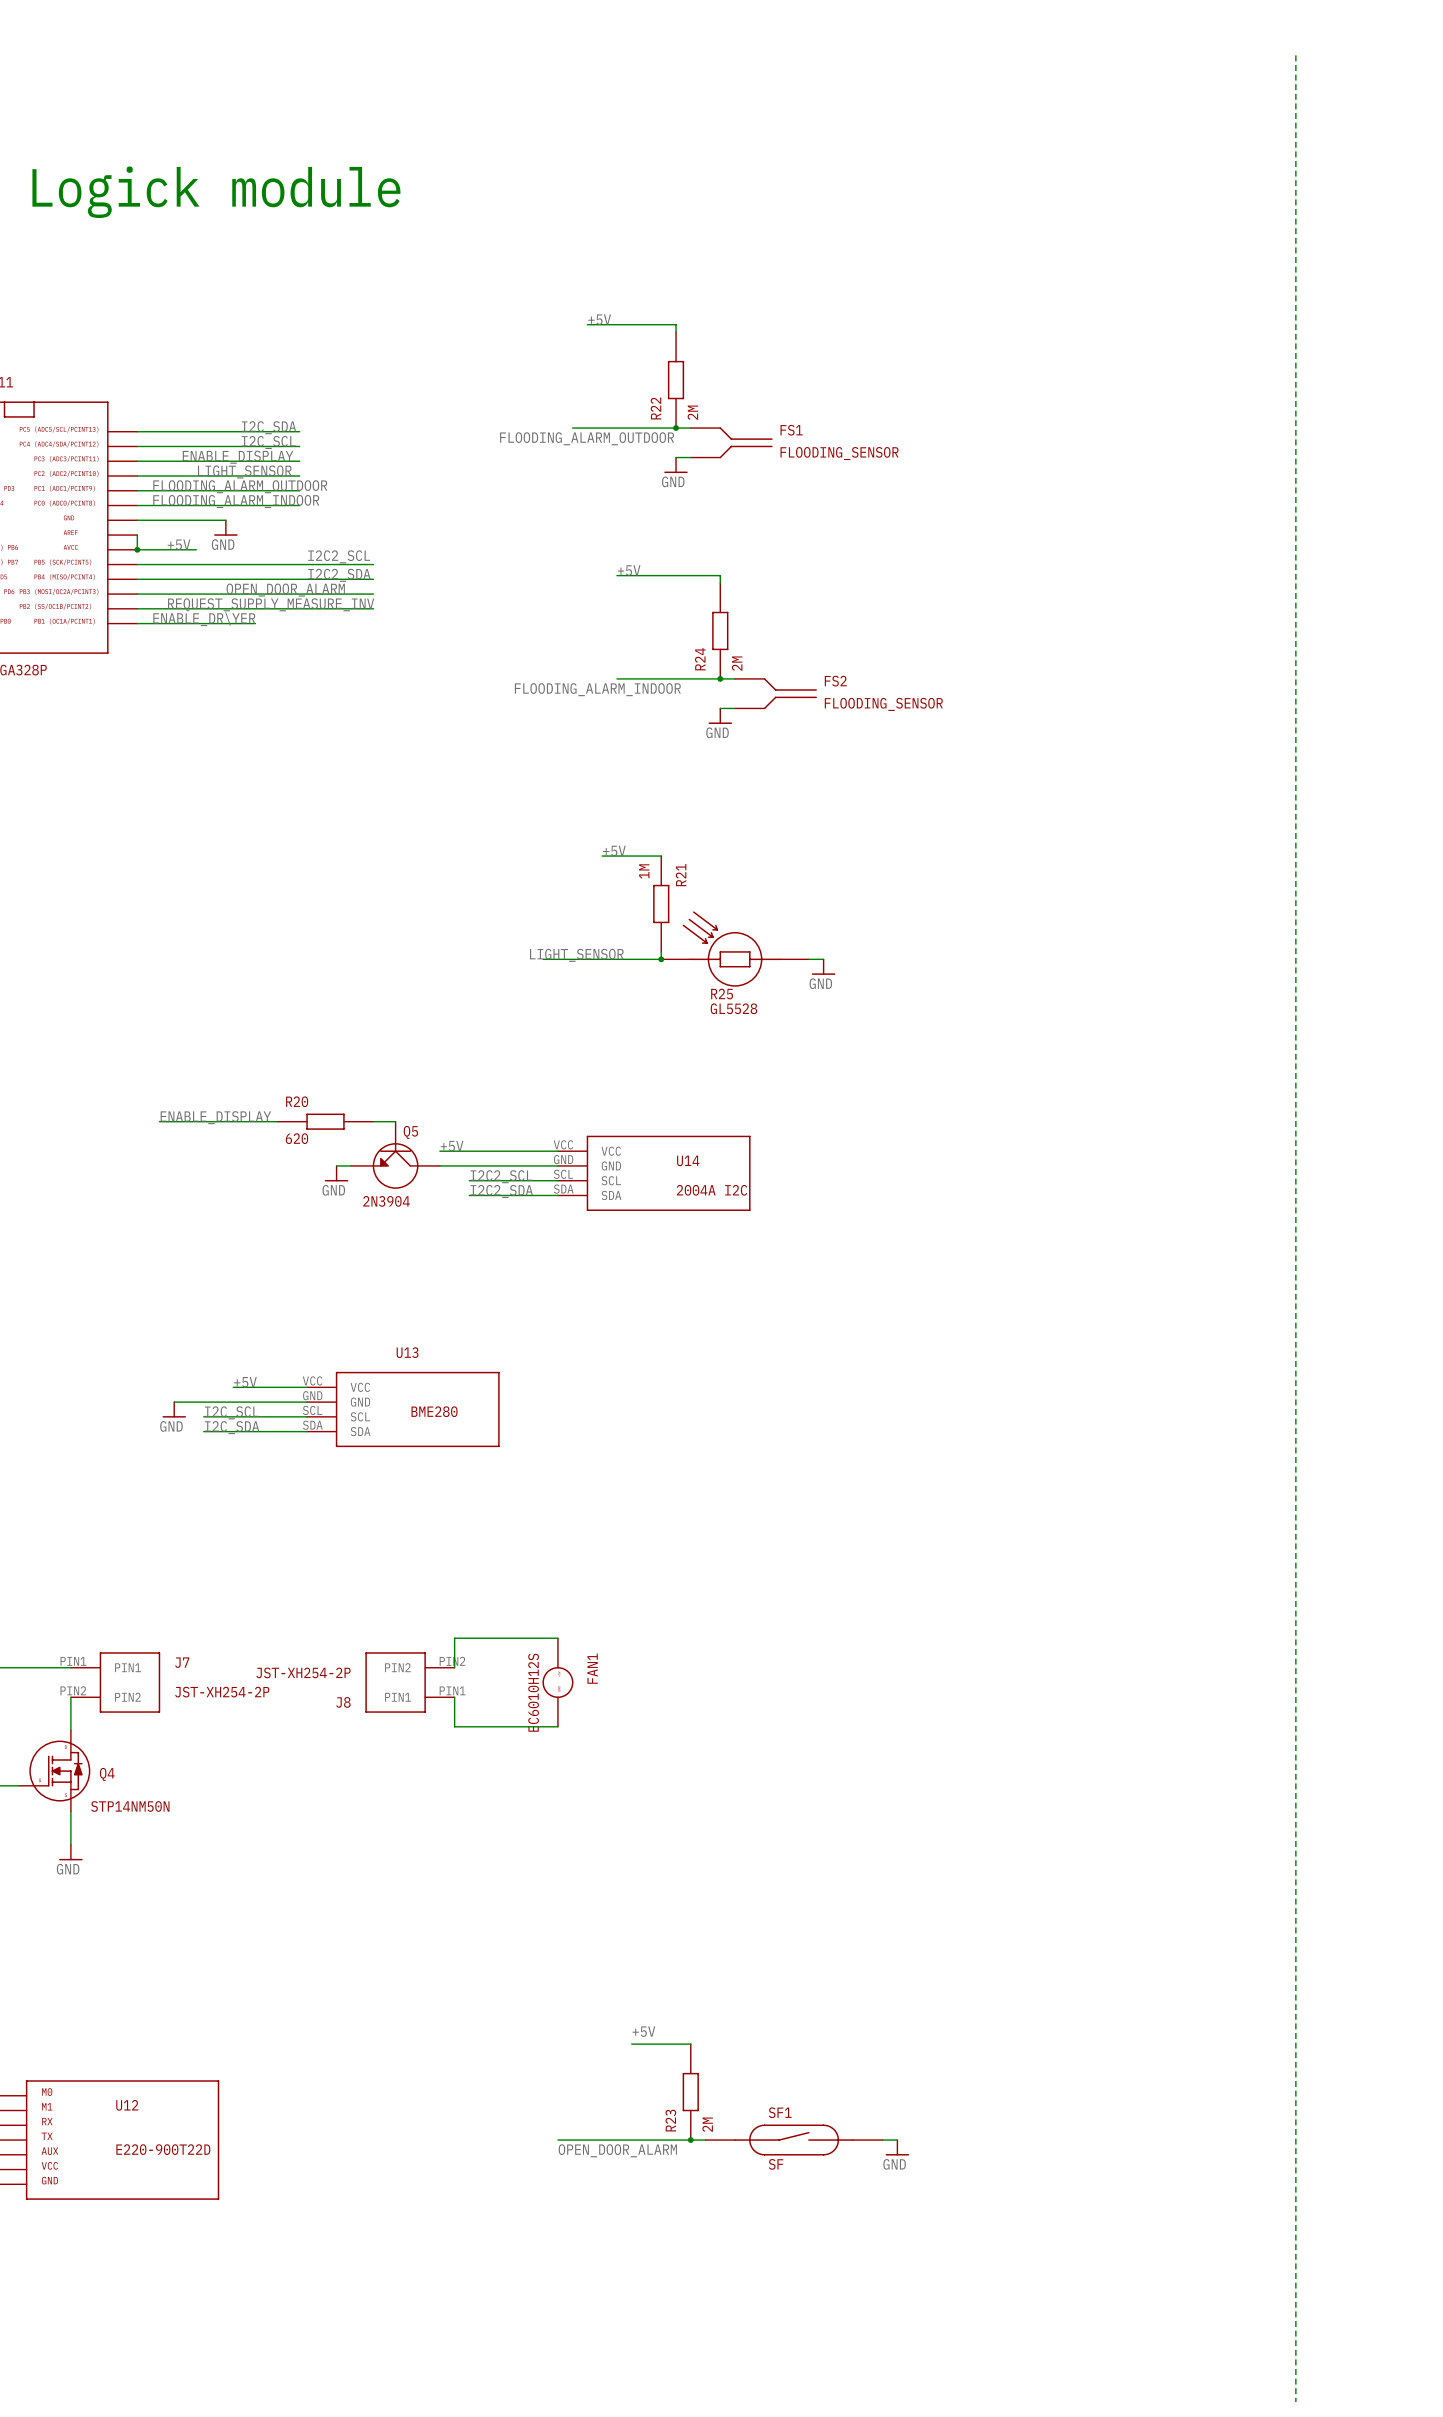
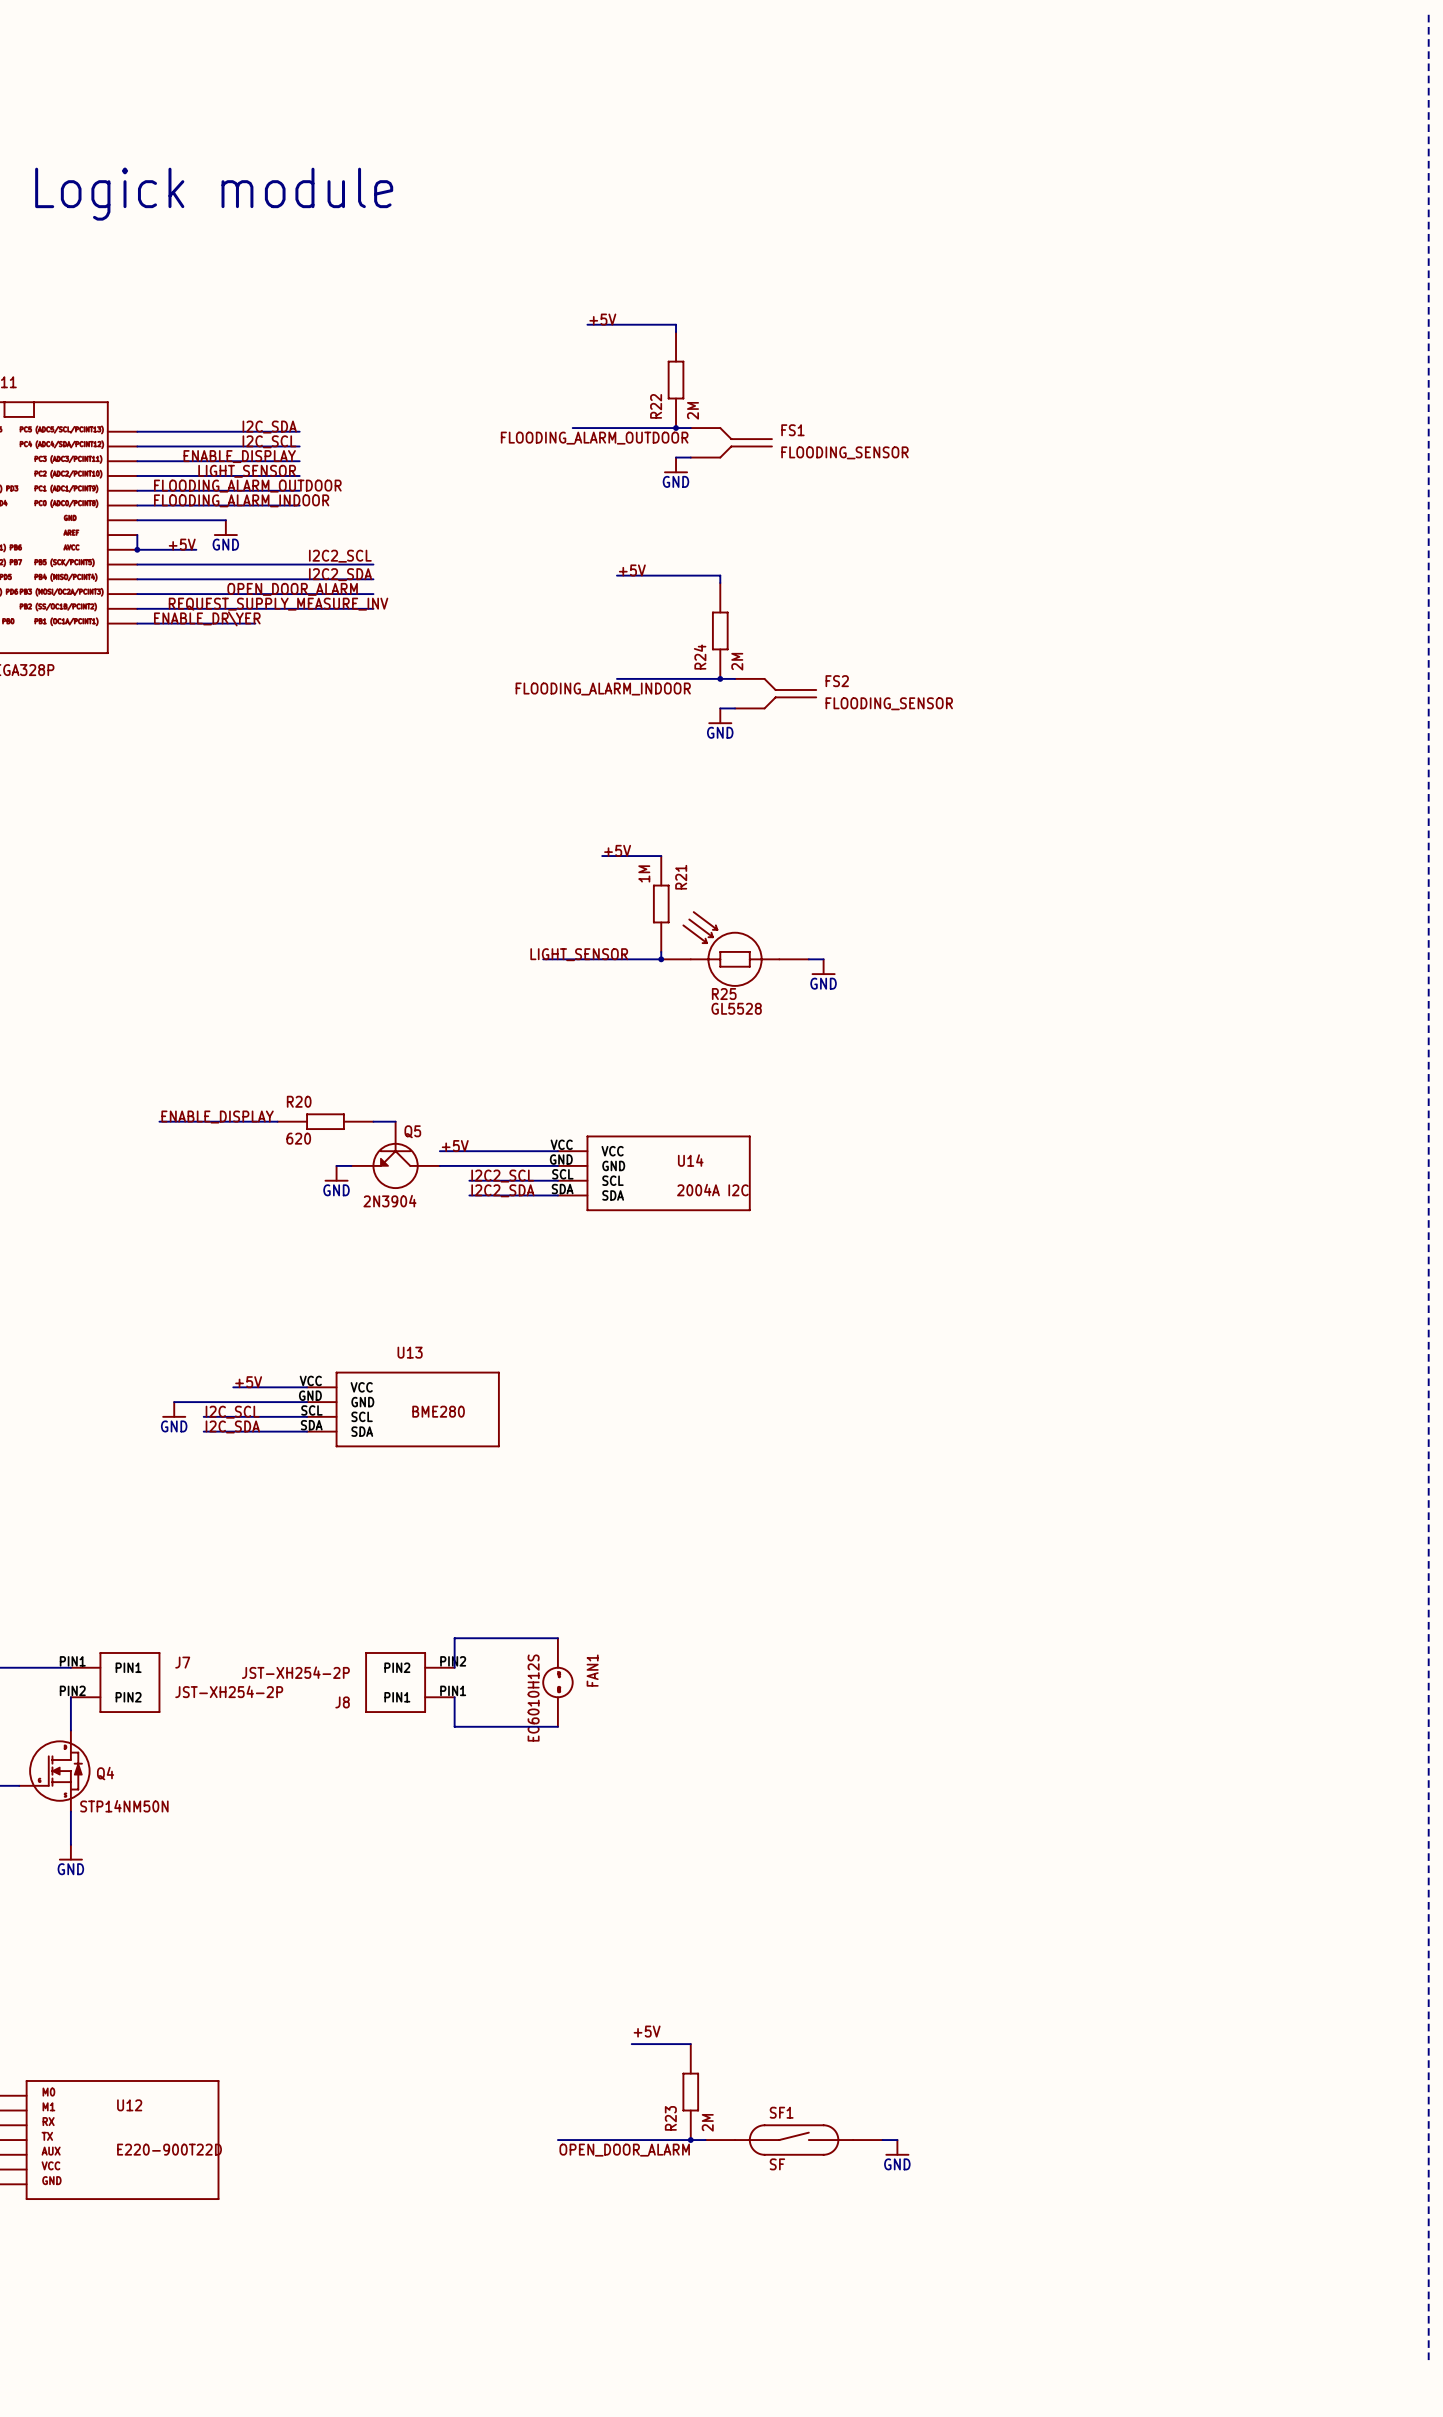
wire: (1295, 55) (1295, 2401) -> (1428, 14) (1428, 2361)

